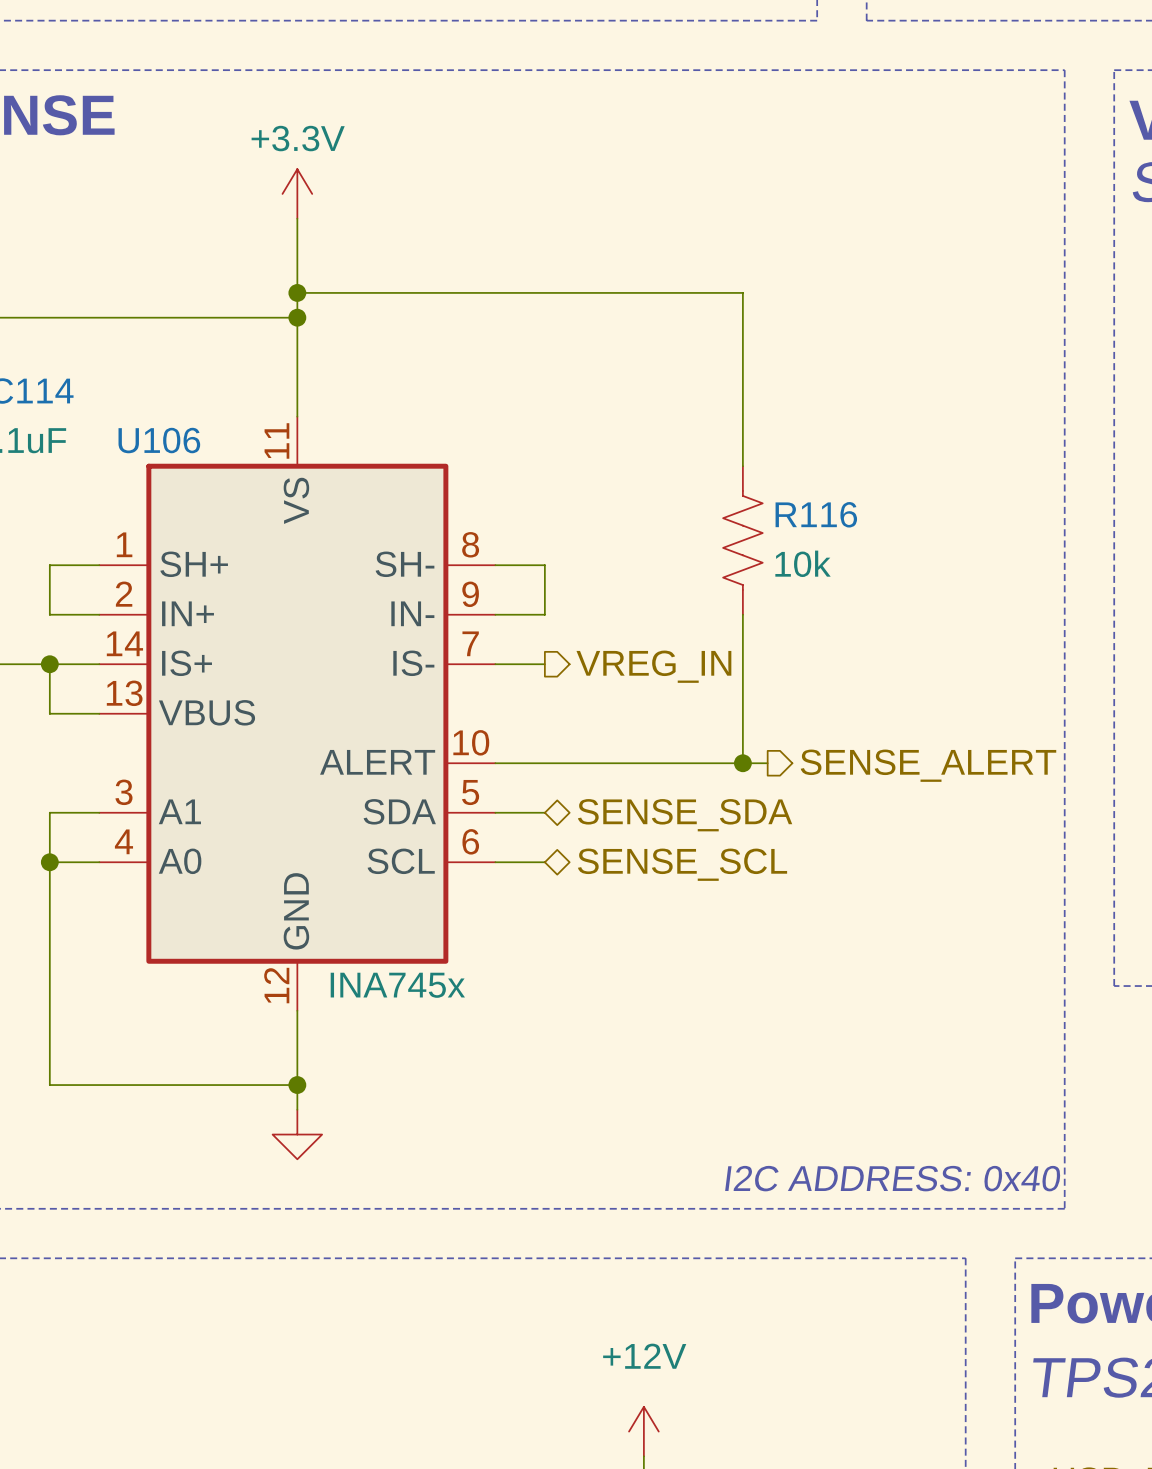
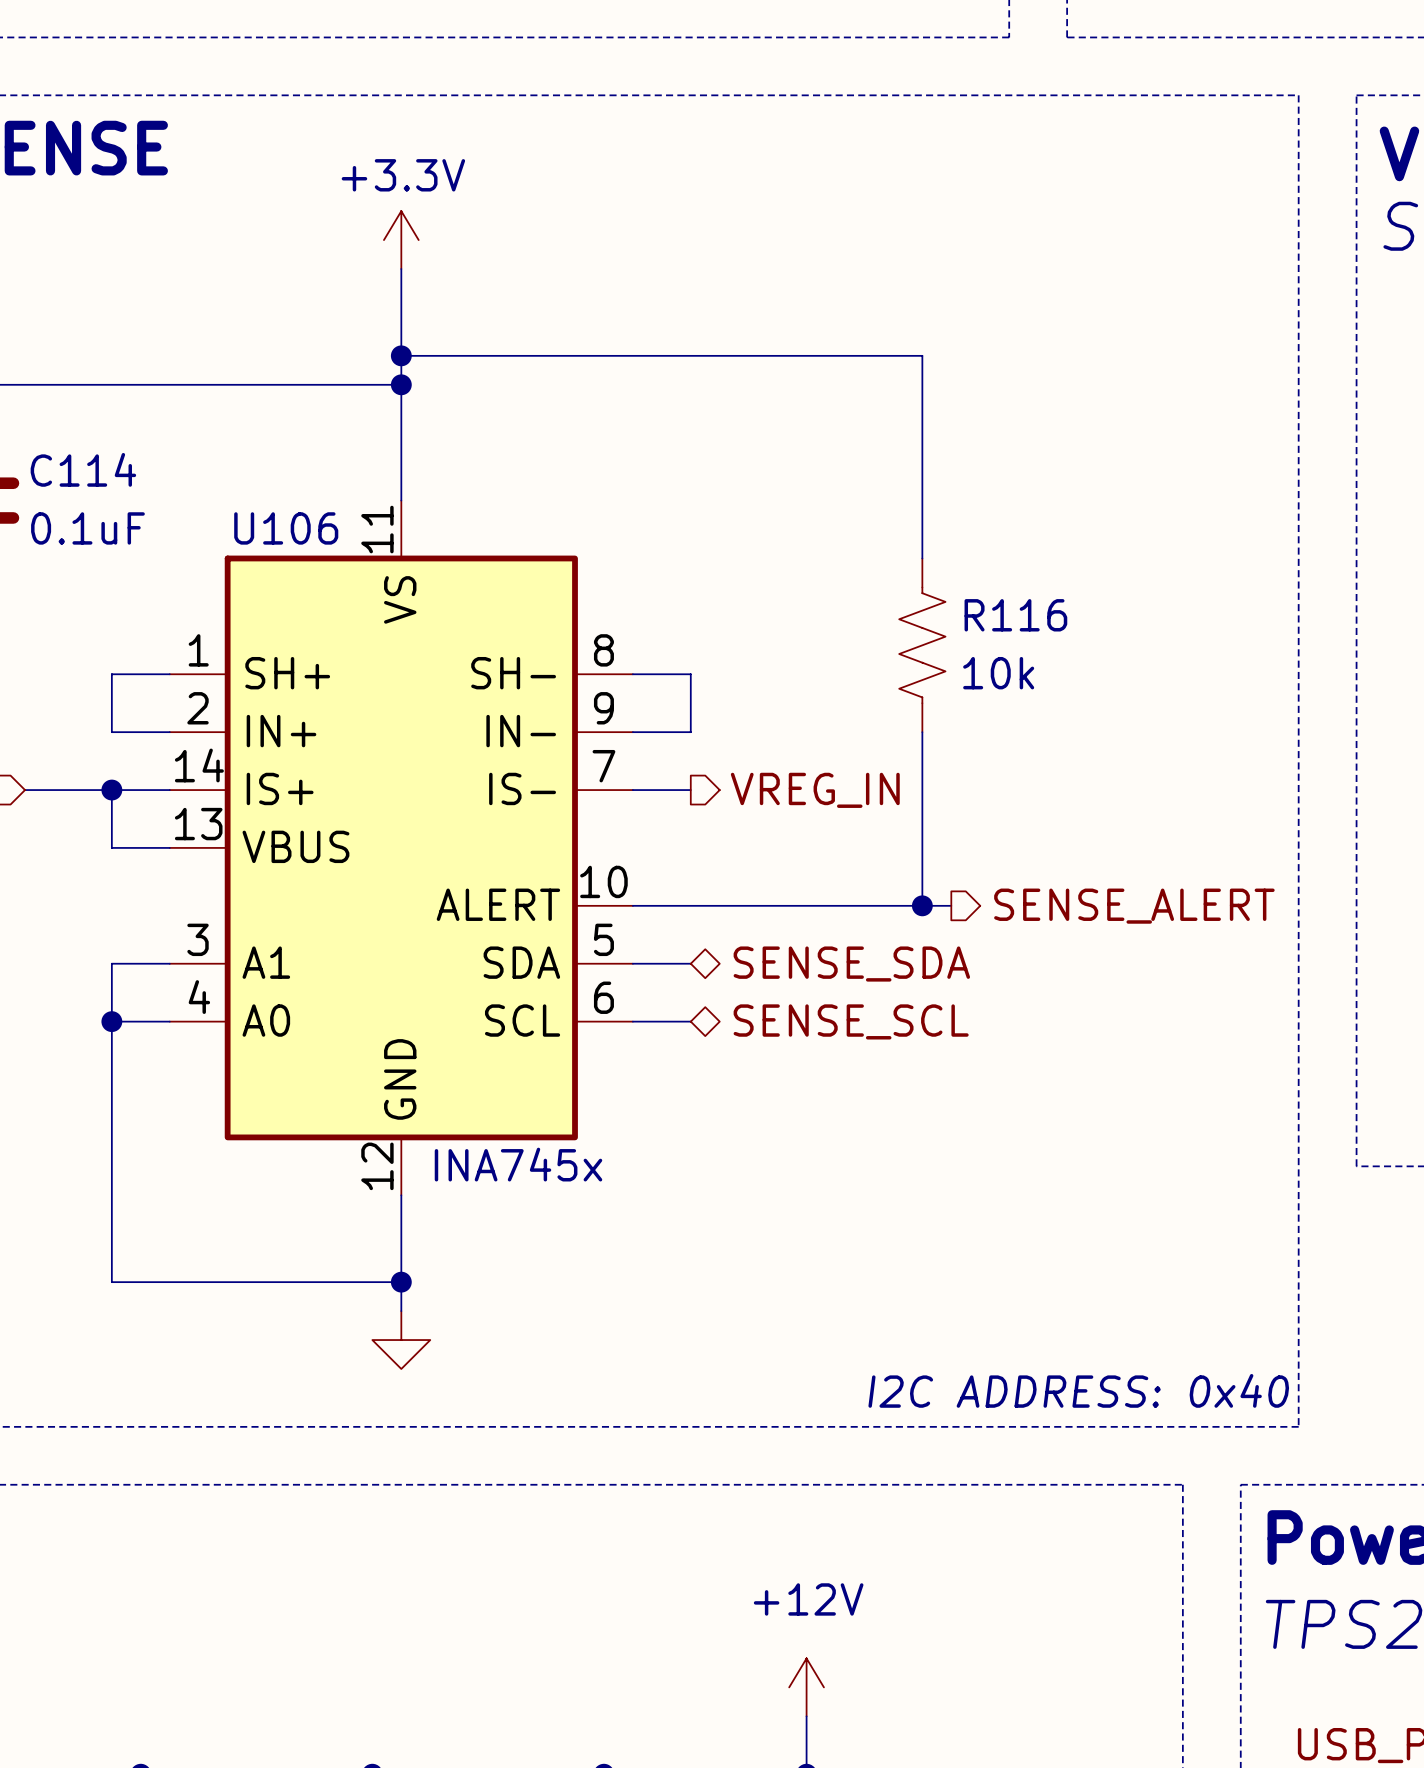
U106 name position: U106 (159, 440) -> U106 (286, 528)

